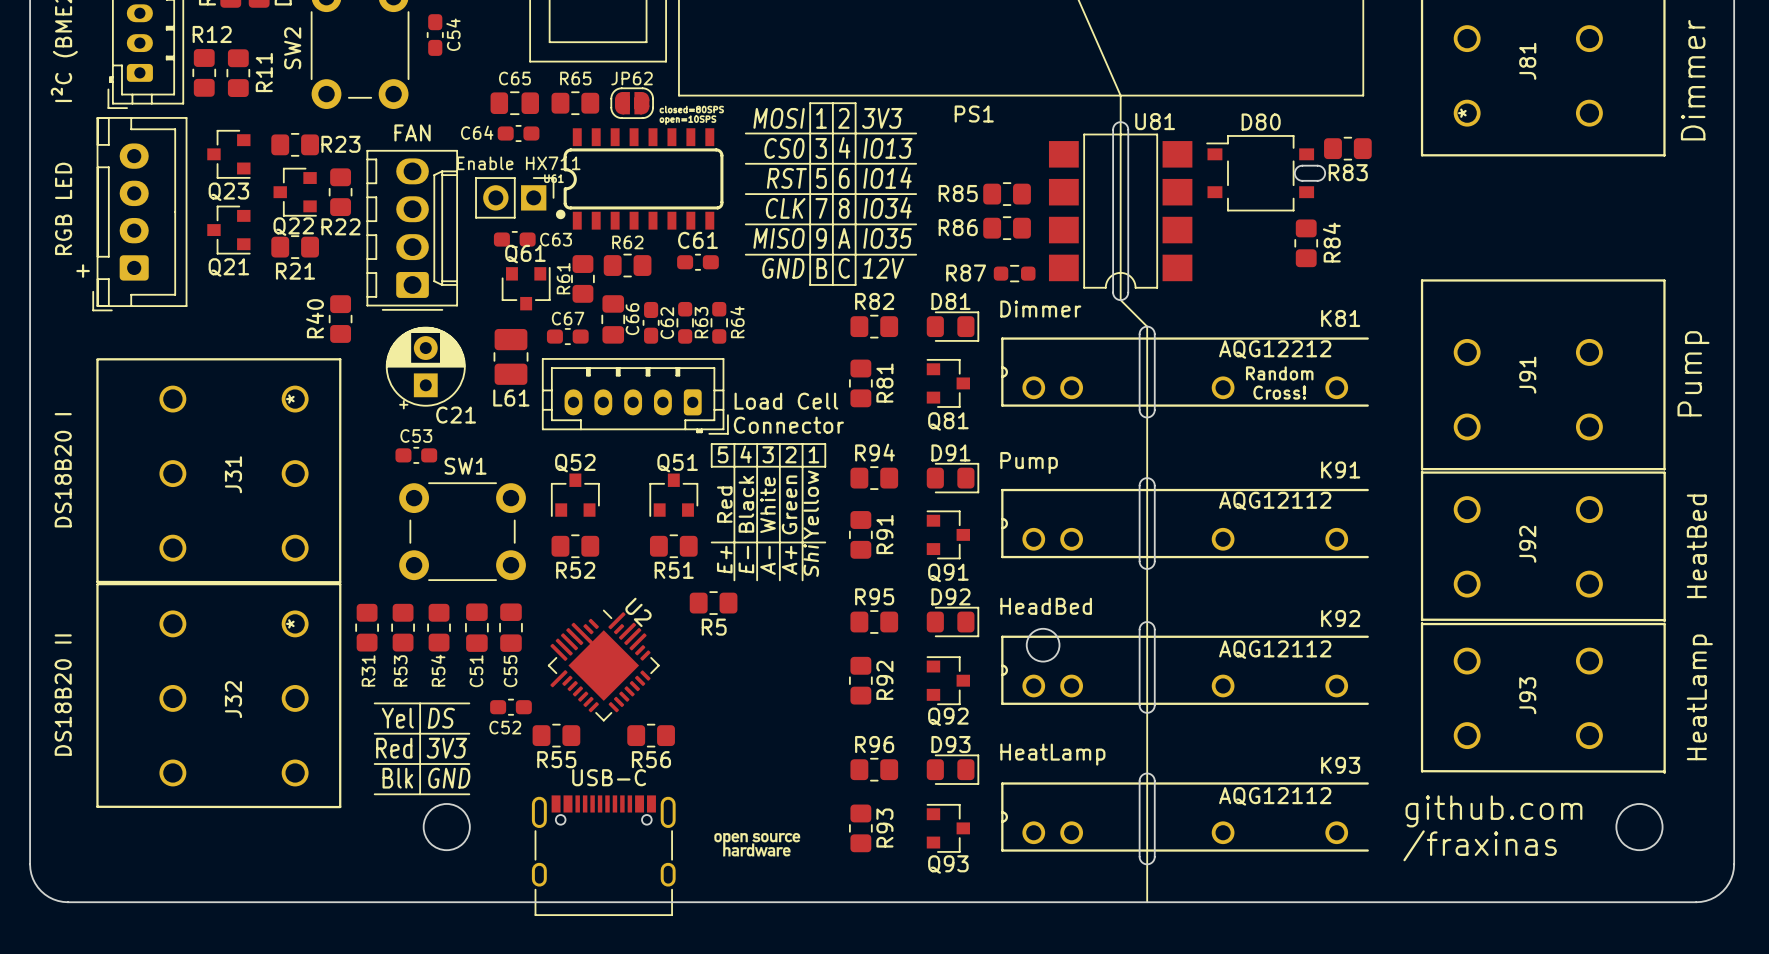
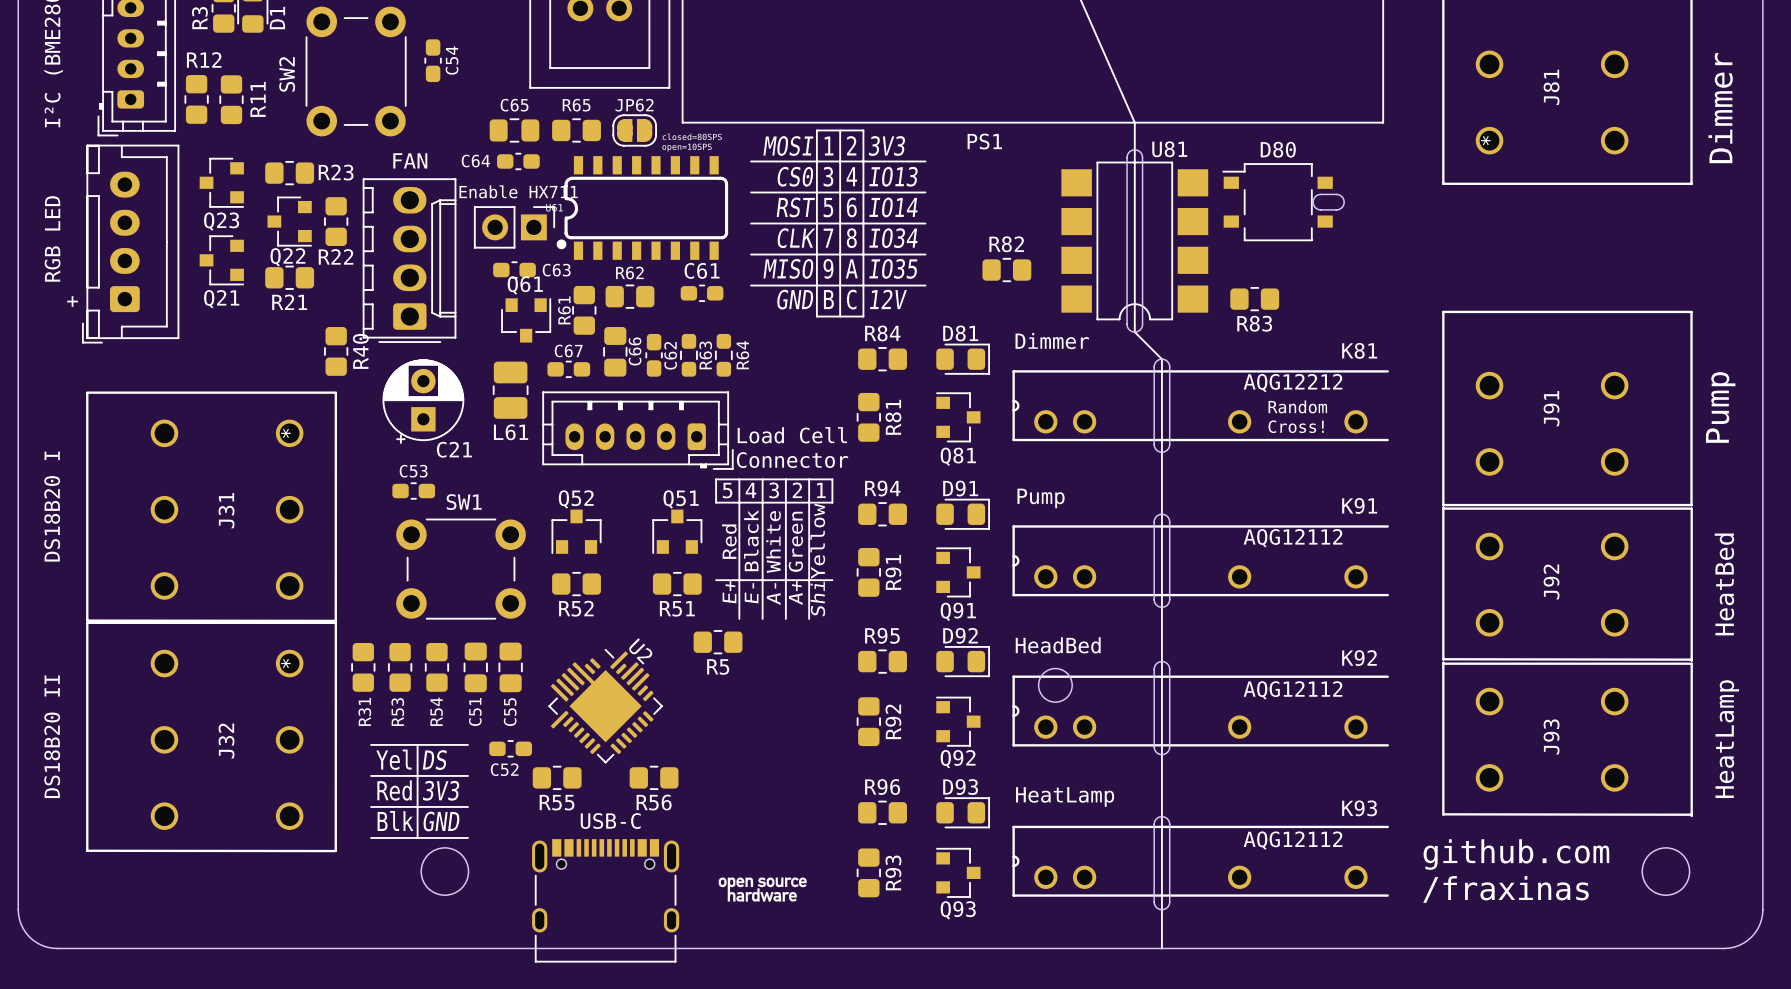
R83 position: (1347, 148) -> (1254, 299)
R85: (1007, 194) -> none
R86: (1007, 228) -> none
R82: none -> (1006, 270)
R84: (1306, 243) -> none
R87: (1014, 273) -> none
R82 name: R82 (874, 301) -> R84 (882, 333)
R40 name position: R40 (315, 318) -> R40 (360, 351)

